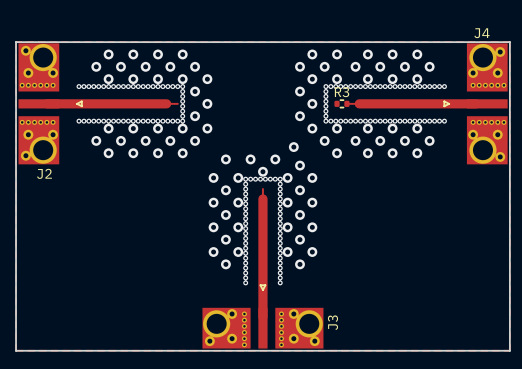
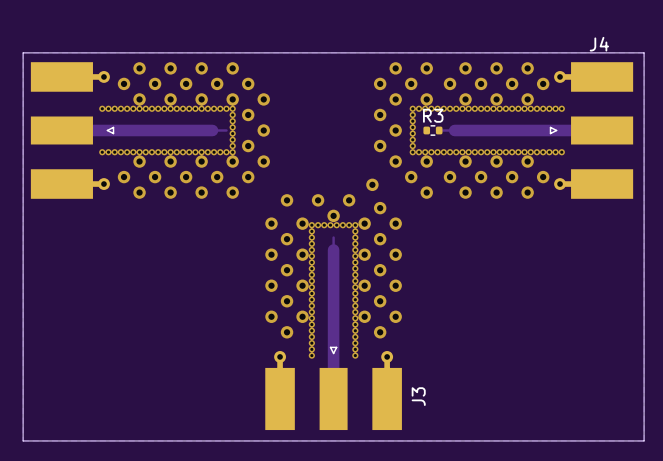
J4 footprint: [443, 43, 508, 165] -> [549, 62, 634, 199]
J2: (50, 103) -> none
part: none -> (72, 130)
J3 footprint: [202, 284, 324, 349] -> [265, 346, 402, 431]

